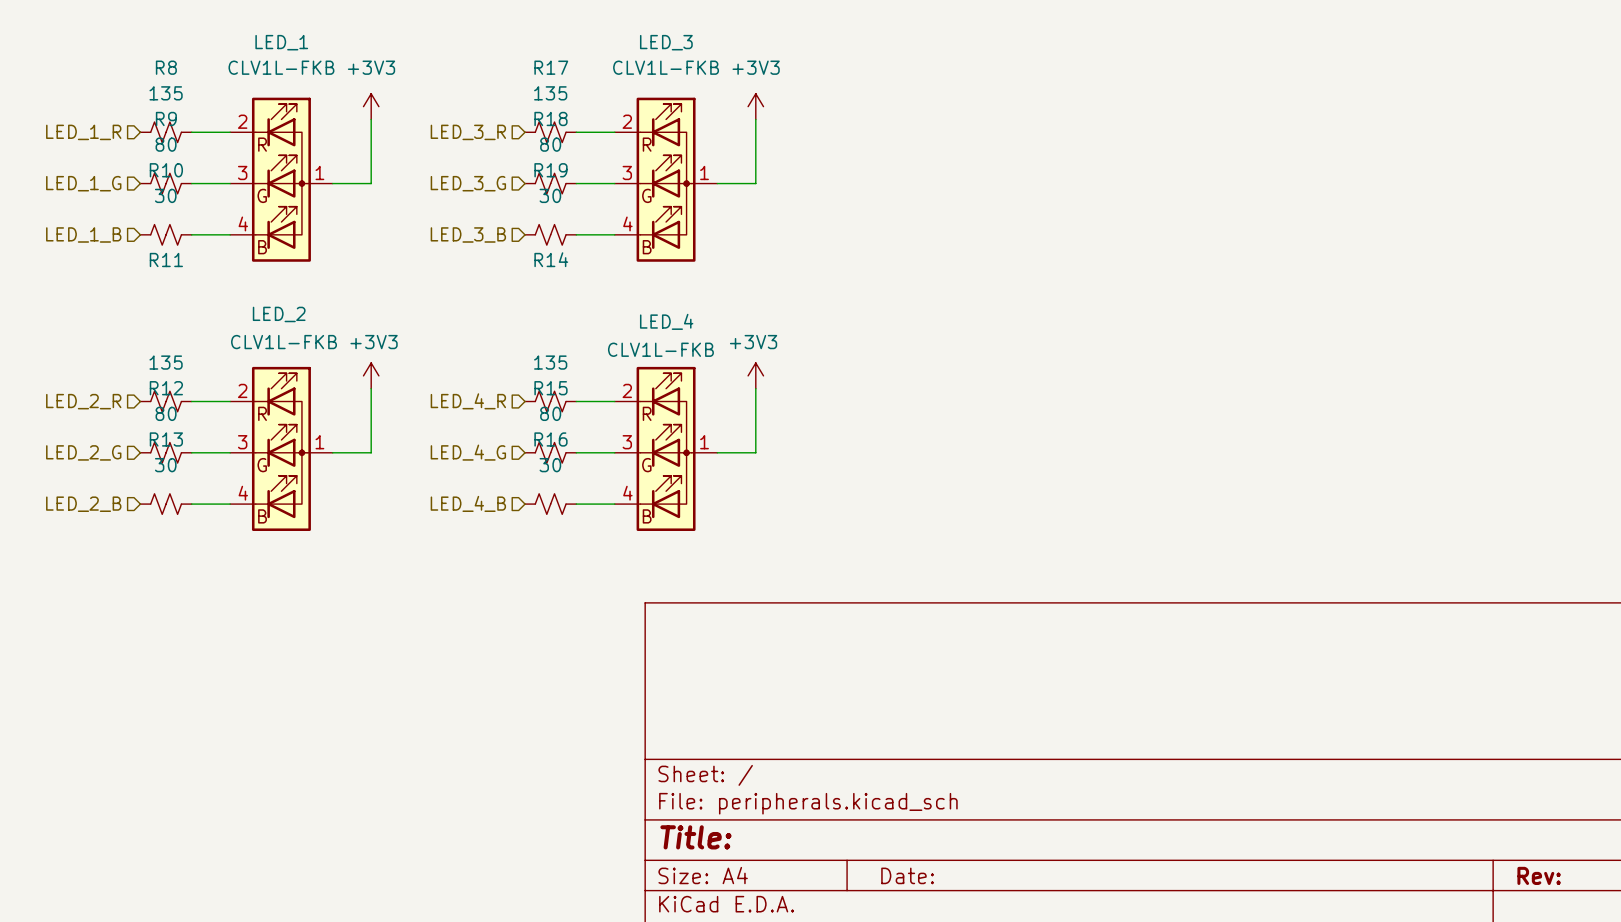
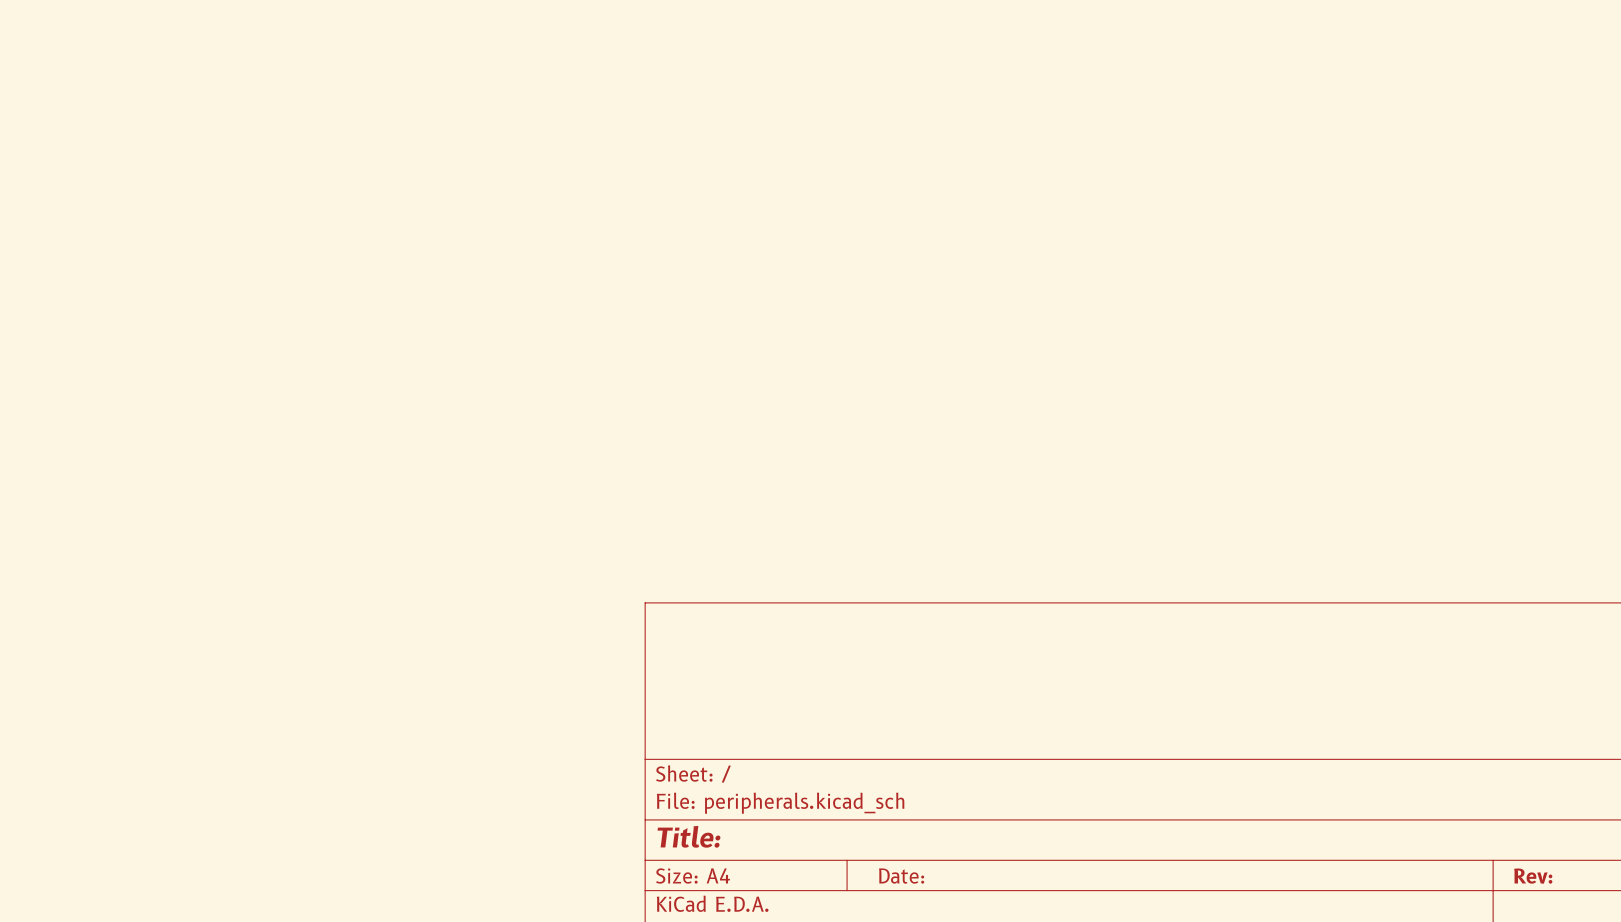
power symbol: +3V3 (371, 106) -> none
power symbol: +3V3 (755, 106) -> none
wire: (371, 119) (371, 183) (332, 183) -> none
wire: (755, 119) (755, 183) (717, 183) -> none
hierarchical label: LED_1_R (83, 132) -> none
R8: 135 (166, 132) -> none
wire: (191, 132) (230, 132) -> none
hierarchical label: LED_3_R (468, 132) -> none
R17: 135 (550, 132) -> none
wire: (576, 132) (614, 132) -> none
LED_1: CLV1L-FKB (281, 179) -> none
LED_3: CLV1L-FKB (666, 179) -> none
hierarchical label: LED_1_G (83, 183) -> none
R9: 80 (166, 183) -> none
wire: (191, 183) (230, 183) -> none
hierarchical label: LED_3_G (468, 183) -> none
R18: 80 (550, 183) -> none
wire: (576, 183) (614, 183) -> none
hierarchical label: LED_1_B (83, 234) -> none
R10: 30 (166, 234) -> none
wire: (191, 234) (230, 234) -> none
hierarchical label: LED_3_B (468, 234) -> none
R19: 30 (550, 234) -> none
wire: (576, 234) (614, 234) -> none
power symbol: +3V3 (371, 375) -> none
power symbol: +3V3 (755, 375) -> none
wire: (371, 388) (371, 452) (332, 452) -> none
wire: (755, 388) (755, 452) (717, 452) -> none
hierarchical label: LED_2_R (83, 401) -> none
R11: 135 (166, 401) -> none
wire: (191, 401) (230, 401) -> none
hierarchical label: LED_4_R (468, 401) -> none
R14: 135 (550, 401) -> none
wire: (576, 401) (614, 401) -> none
LED_2: CLV1L-FKB (281, 448) -> none
LED_4: CLV1L-FKB (666, 448) -> none
hierarchical label: LED_2_G (83, 452) -> none
R12: 80 (166, 452) -> none
wire: (191, 452) (230, 452) -> none
hierarchical label: LED_4_G (468, 452) -> none
R15: 80 (550, 452) -> none
wire: (576, 452) (614, 452) -> none
hierarchical label: LED_4_B (468, 503) -> none
hierarchical label: LED_2_B (83, 504) -> none
R13: 30 (166, 504) -> none
wire: (191, 504) (230, 504) -> none
R16: 30 (550, 504) -> none
wire: (576, 504) (614, 504) -> none

